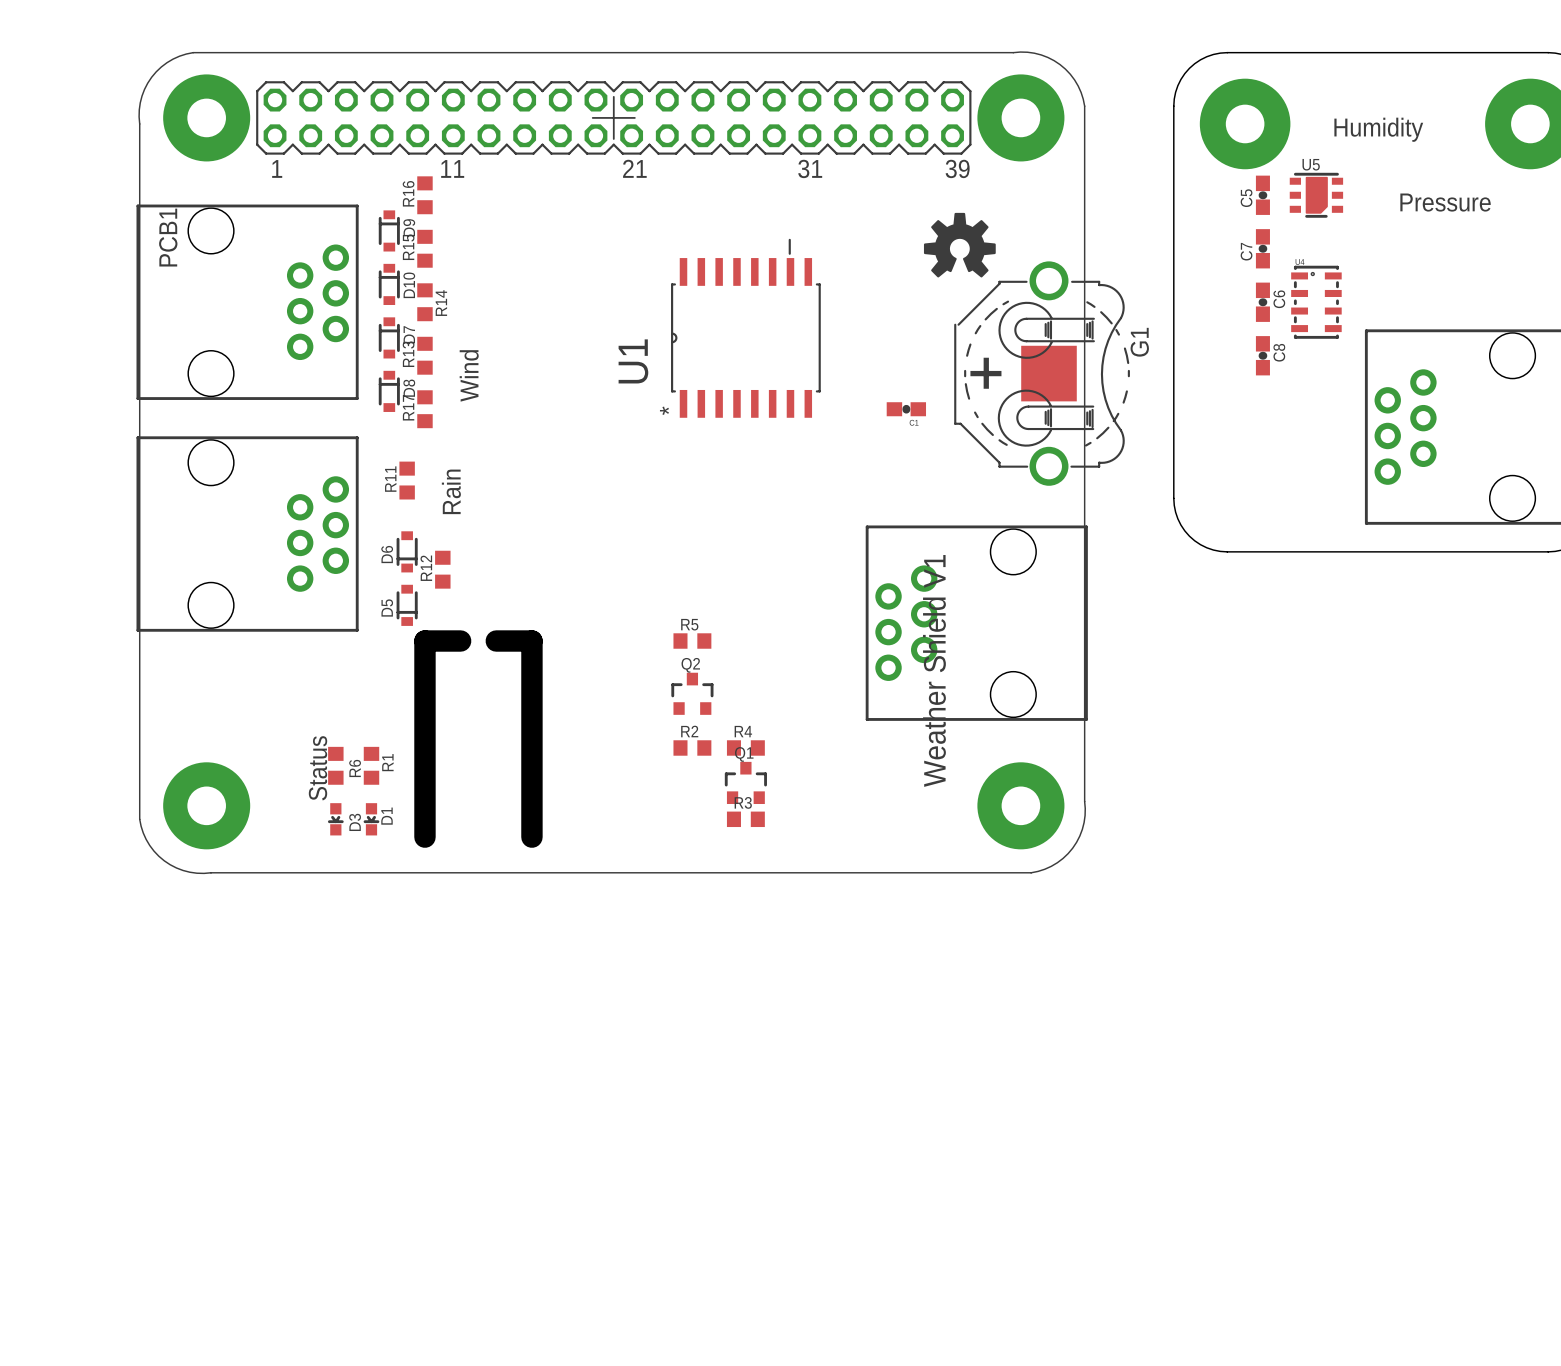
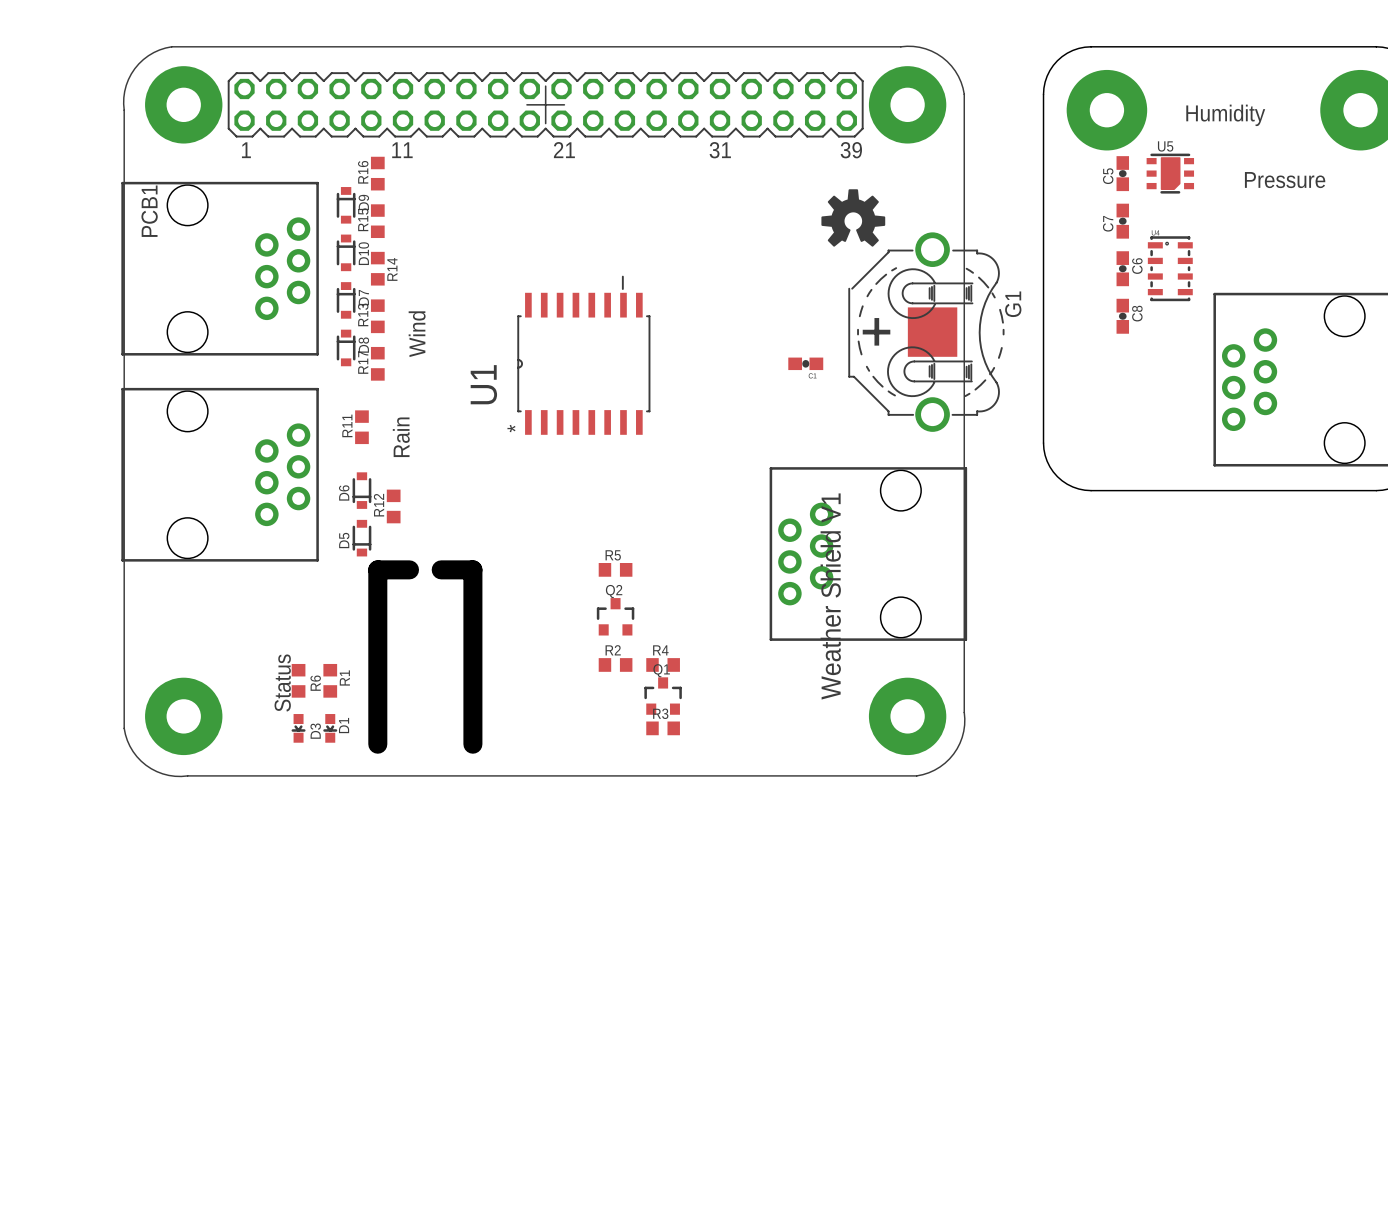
U1 position: (745, 328) -> (583, 355)

